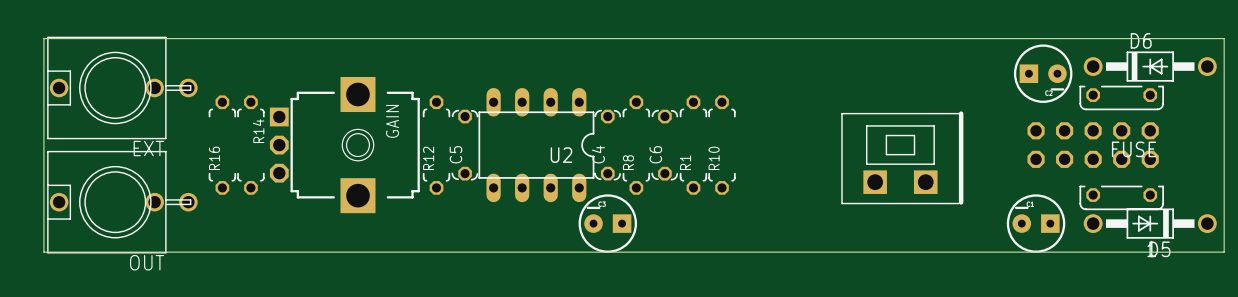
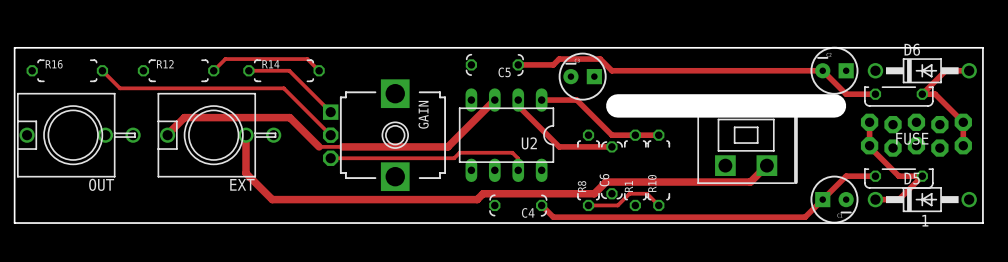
track: none -> (518, 64) (553, 64) (559, 59) (600, 59) (611, 70) (822, 70) (846, 94) (875, 94)
track: none -> (102, 70) (120, 88) (283, 88) (330, 135)
track: none -> (213, 70) (225, 59) (307, 59) (319, 70)
track: none -> (248, 70) (289, 70) (330, 112)
track: none -> (969, 70) (945, 70) (922, 94) (935, 94) (963, 122) (963, 145)
part rotation: 0° (1043, 73) -> 180° (834, 70)
EXT position: (122, 87) -> (219, 135)
track: none -> (494, 100) (447, 146) (319, 146) (289, 117) (184, 117) (167, 135)
track: none -> (518, 100) (518, 105) (559, 146) (611, 146)
track: none -> (541, 100) (576, 100) (611, 135) (658, 135)
board edge: none -> (617, 105) (834, 105)
track: none -> (869, 122) (869, 146) (898, 176) (922, 176) (898, 199) (875, 199)
R16 rotation: 0° (222, 145) -> 90° clockwise (67, 70)
R16 position: (222, 145) -> (67, 70)
R14 rotation: 0° (250, 145) -> 90° clockwise (283, 70)
R14 position: (250, 145) -> (283, 70)
track: none -> (246, 135) (246, 173) (272, 199) (477, 199) (483, 193) (594, 193) (606, 182) (750, 182) (766, 165)
GAIN position: (344, 145) -> (384, 135)
R12 rotation: 0° (436, 145) -> 90° clockwise (178, 70)
R12 position: (436, 145) -> (178, 70)
C5 rotation: 0° (464, 145) -> 90° clockwise (494, 64)
C5 position: (464, 145) -> (494, 64)
U2 position: (536, 145) -> (506, 135)
C4 rotation: 0° (607, 145) -> 90° clockwise (518, 205)
C4 position: (607, 145) -> (518, 205)
R8 position: (636, 145) -> (588, 170)
C6 position: (664, 145) -> (611, 170)
R1 position: (693, 145) -> (635, 170)
R10 position: (722, 145) -> (658, 170)
part: (1093, 145) -> none
part: none -> (916, 135)
part: (902, 158) -> none
part: none -> (747, 145)
track: none -> (330, 158) (454, 158) (459, 152) (512, 152) (518, 158) (518, 170)
track: none -> (875, 176) (846, 176) (805, 217) (553, 217) (541, 205)
OUT position: (122, 202) -> (78, 135)
part position: (607, 223) -> (582, 76)
part rotation: 0° (1036, 223) -> 180° (834, 199)
D5 rotation: 0° (1150, 223) -> 180° (922, 199)
track: none -> (588, 205) (617, 205) (629, 193) (647, 193) (658, 205)

